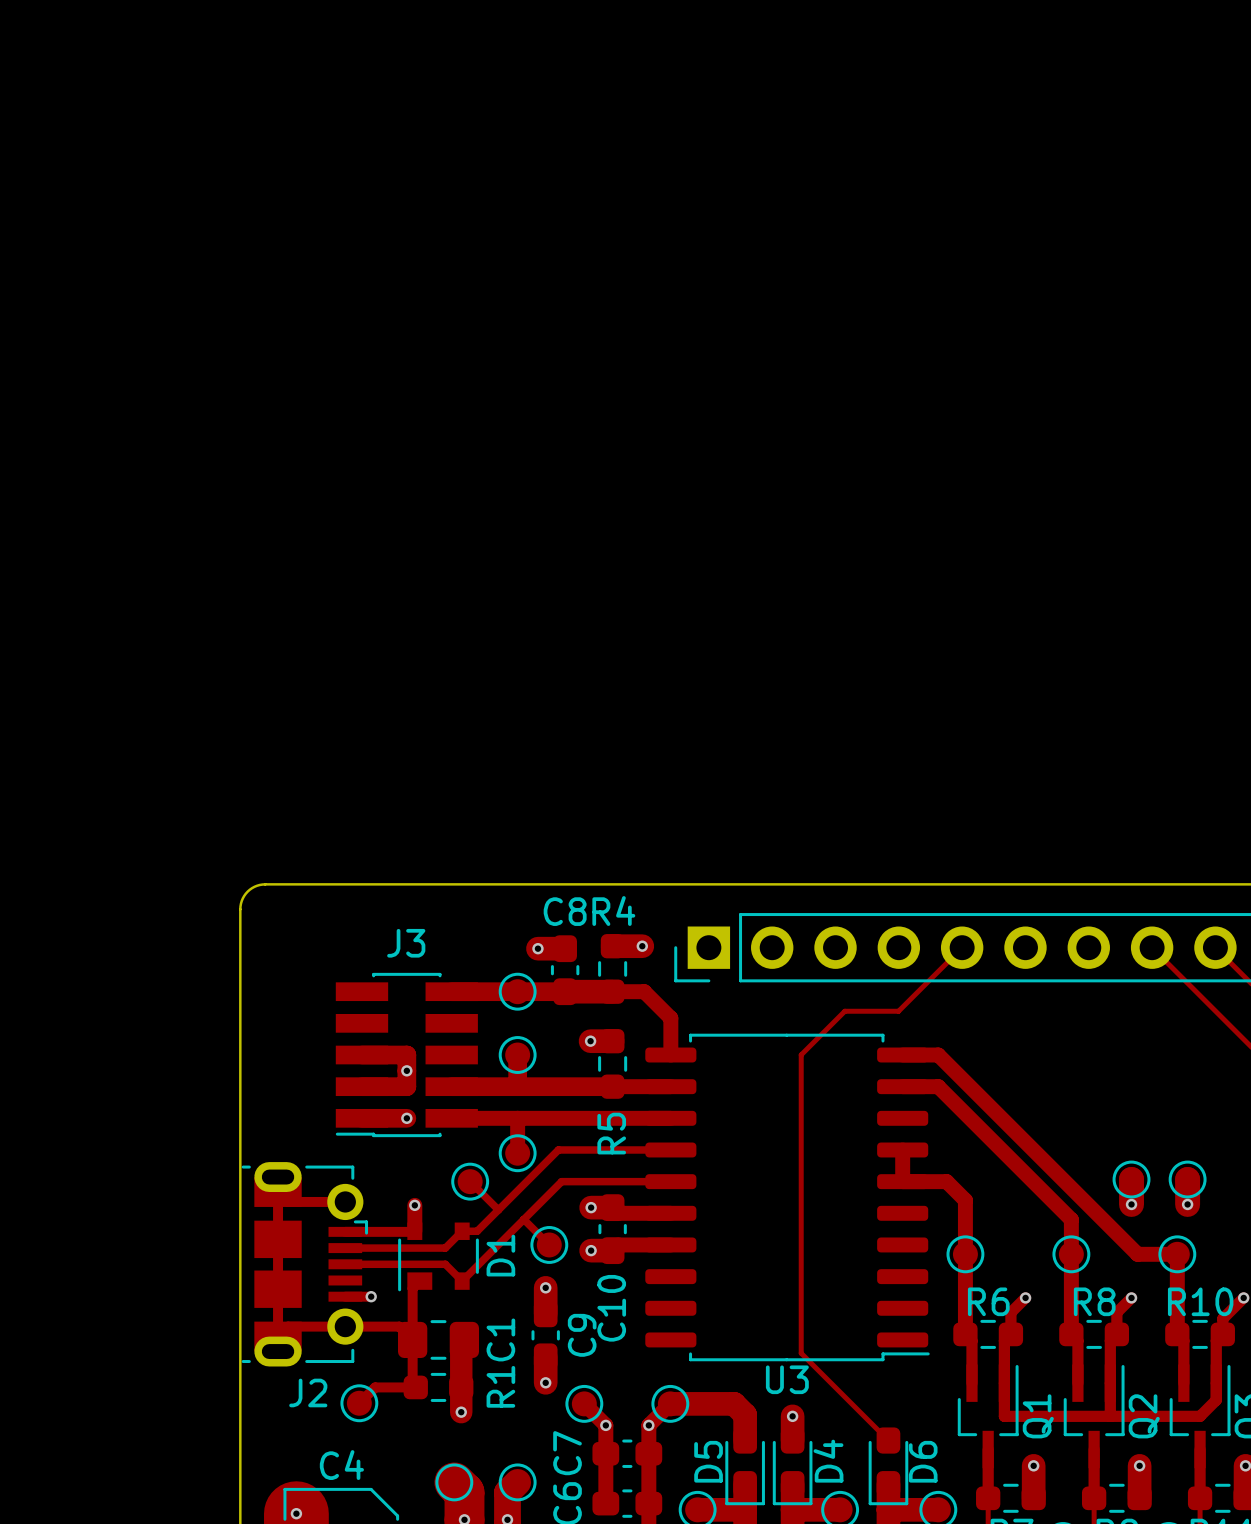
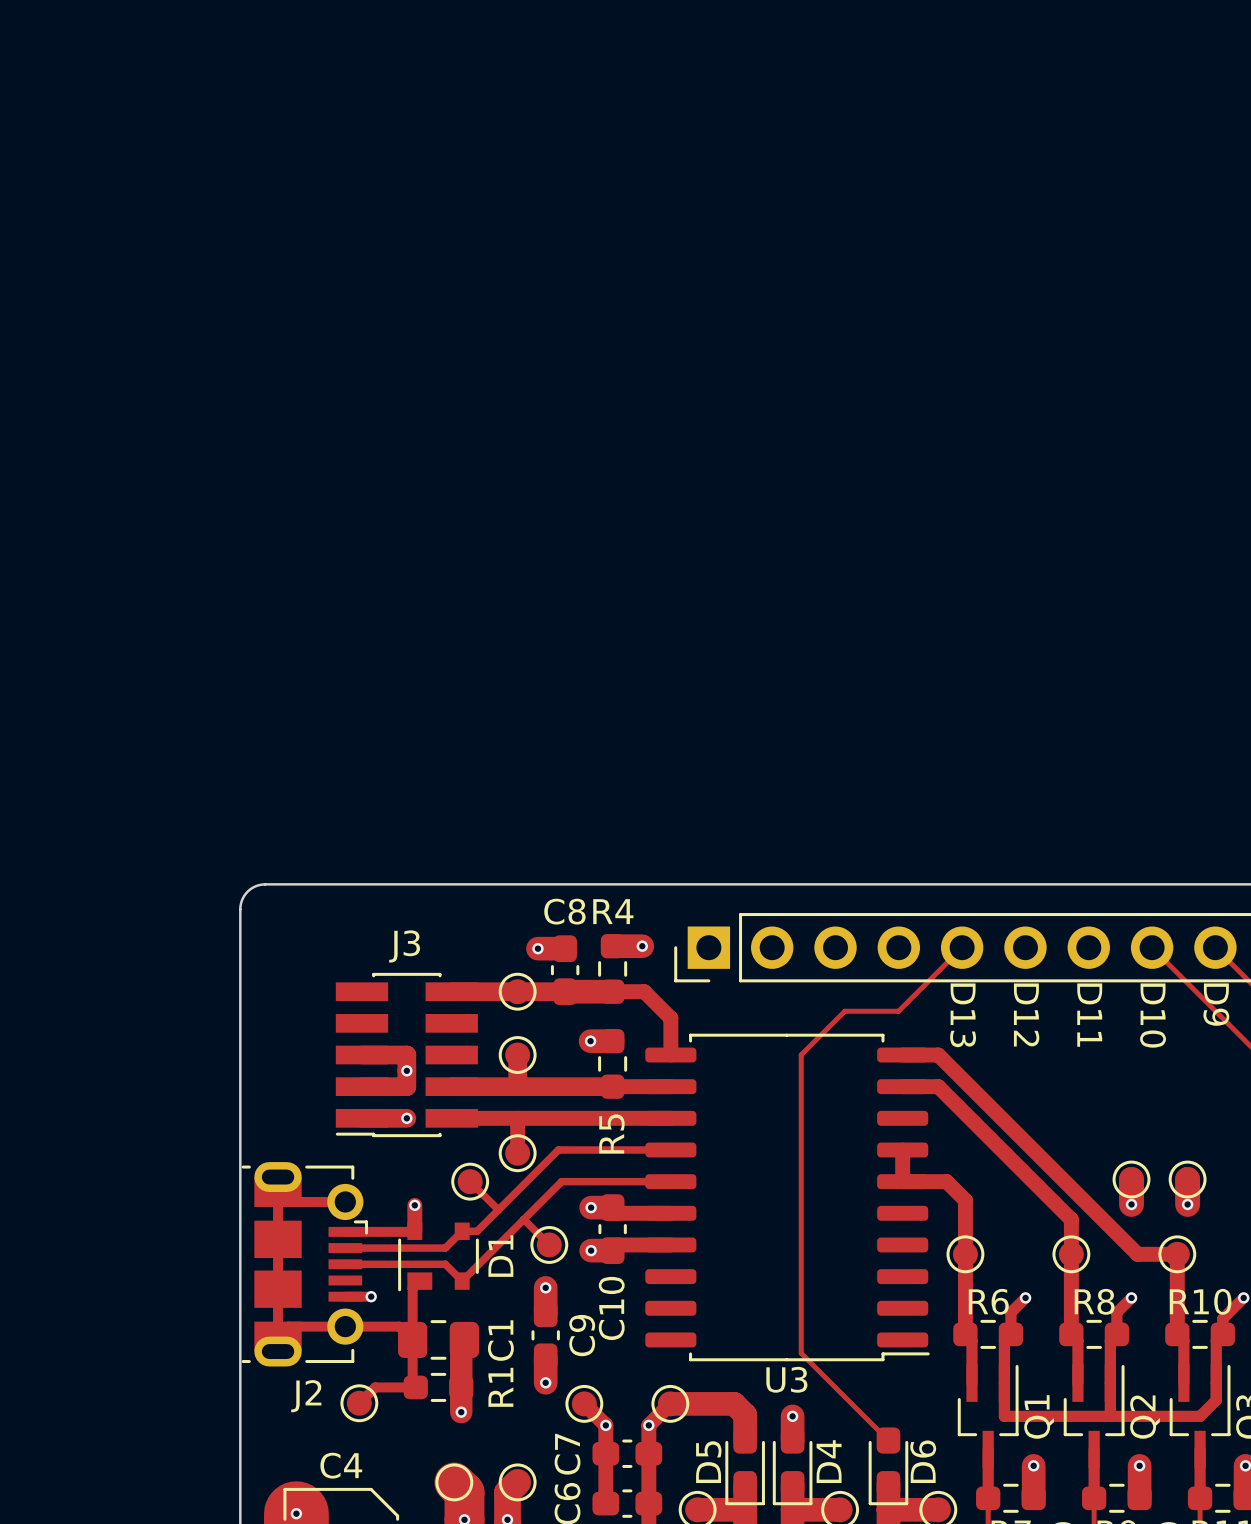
text: none -> D9 (1216, 1004)
text: none -> D13 (963, 1015)
text: none -> D12 (1026, 1014)
text: none -> D11 (1089, 1015)
text: none -> D10 (1153, 1015)

